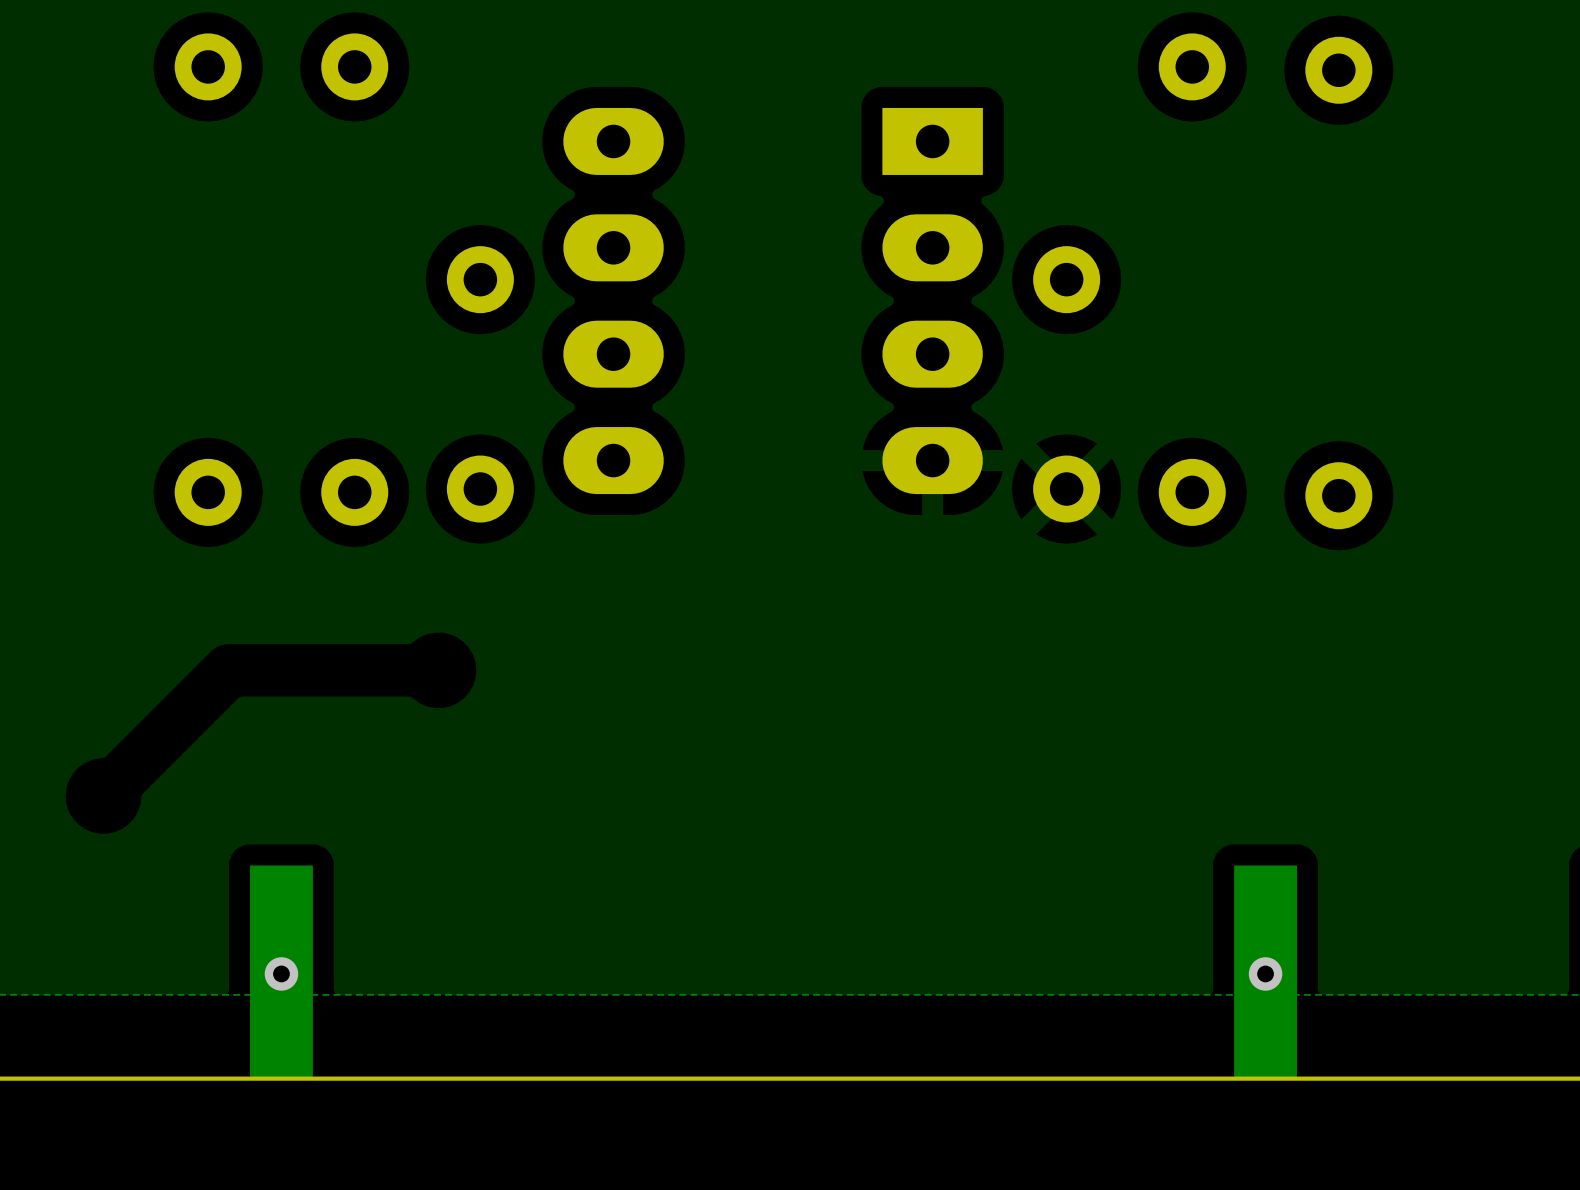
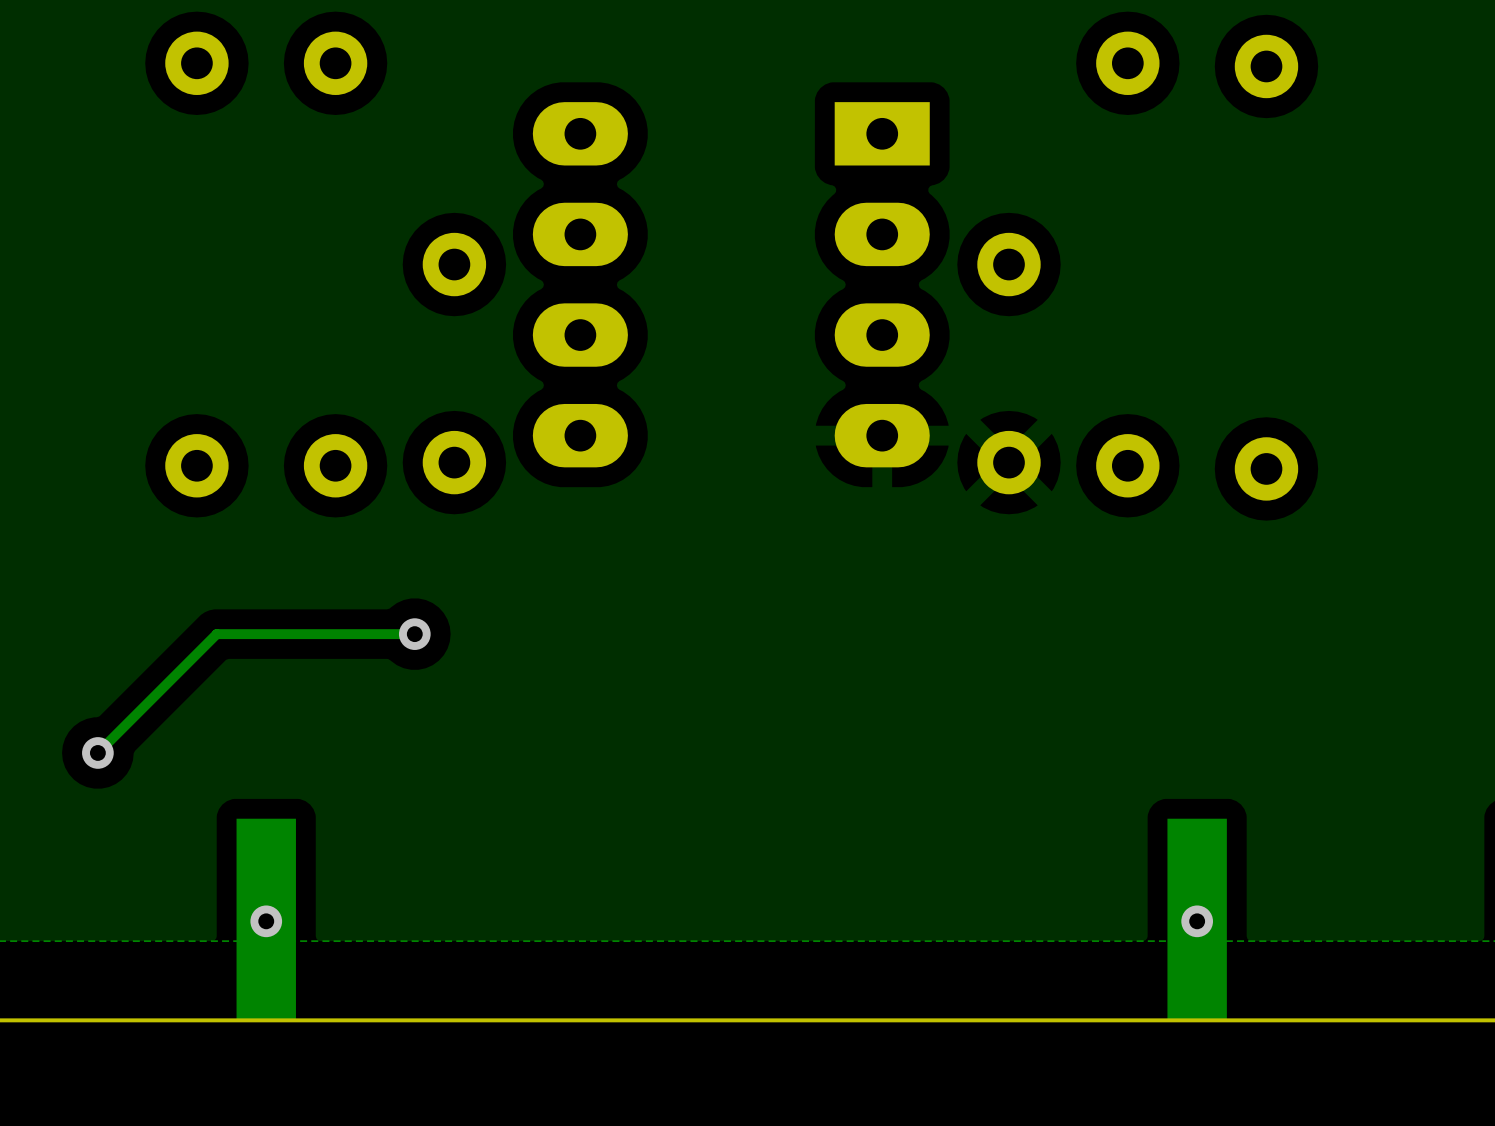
track: none -> (414, 634) (216, 634) (97, 752)
via: none -> (414, 634)
via: none -> (97, 752)

